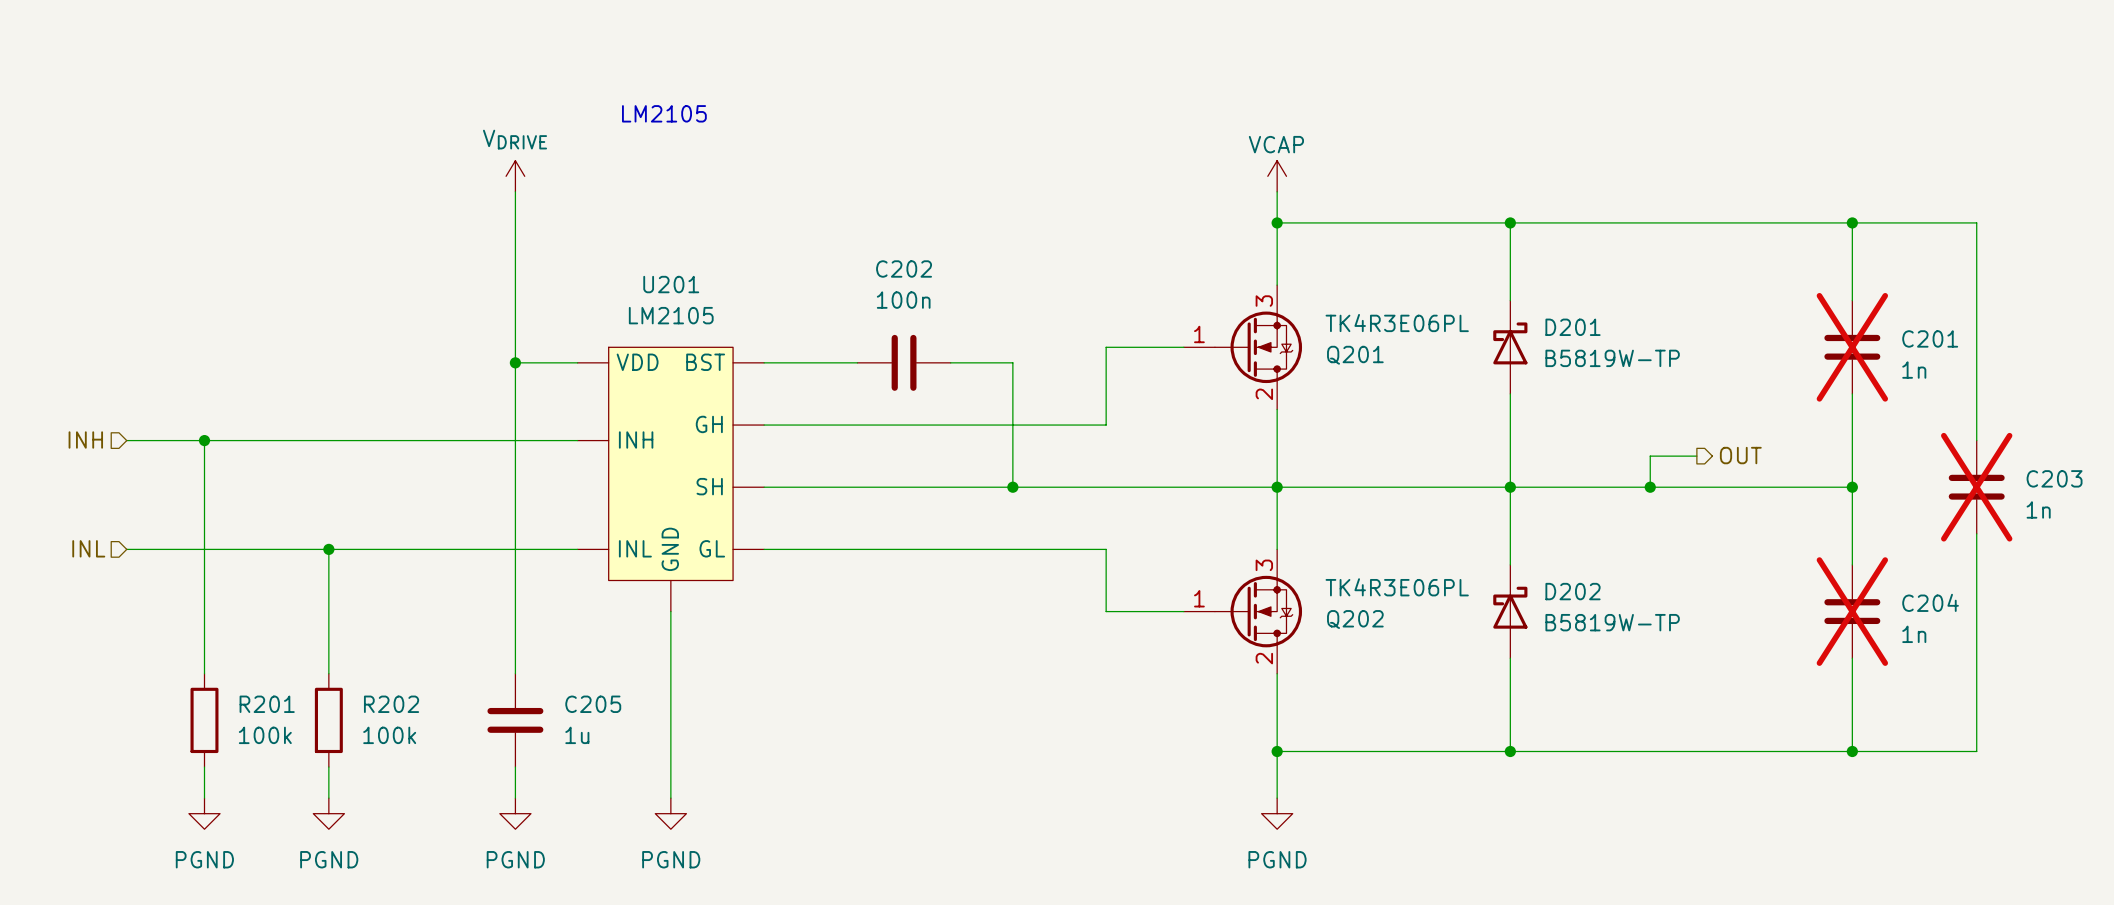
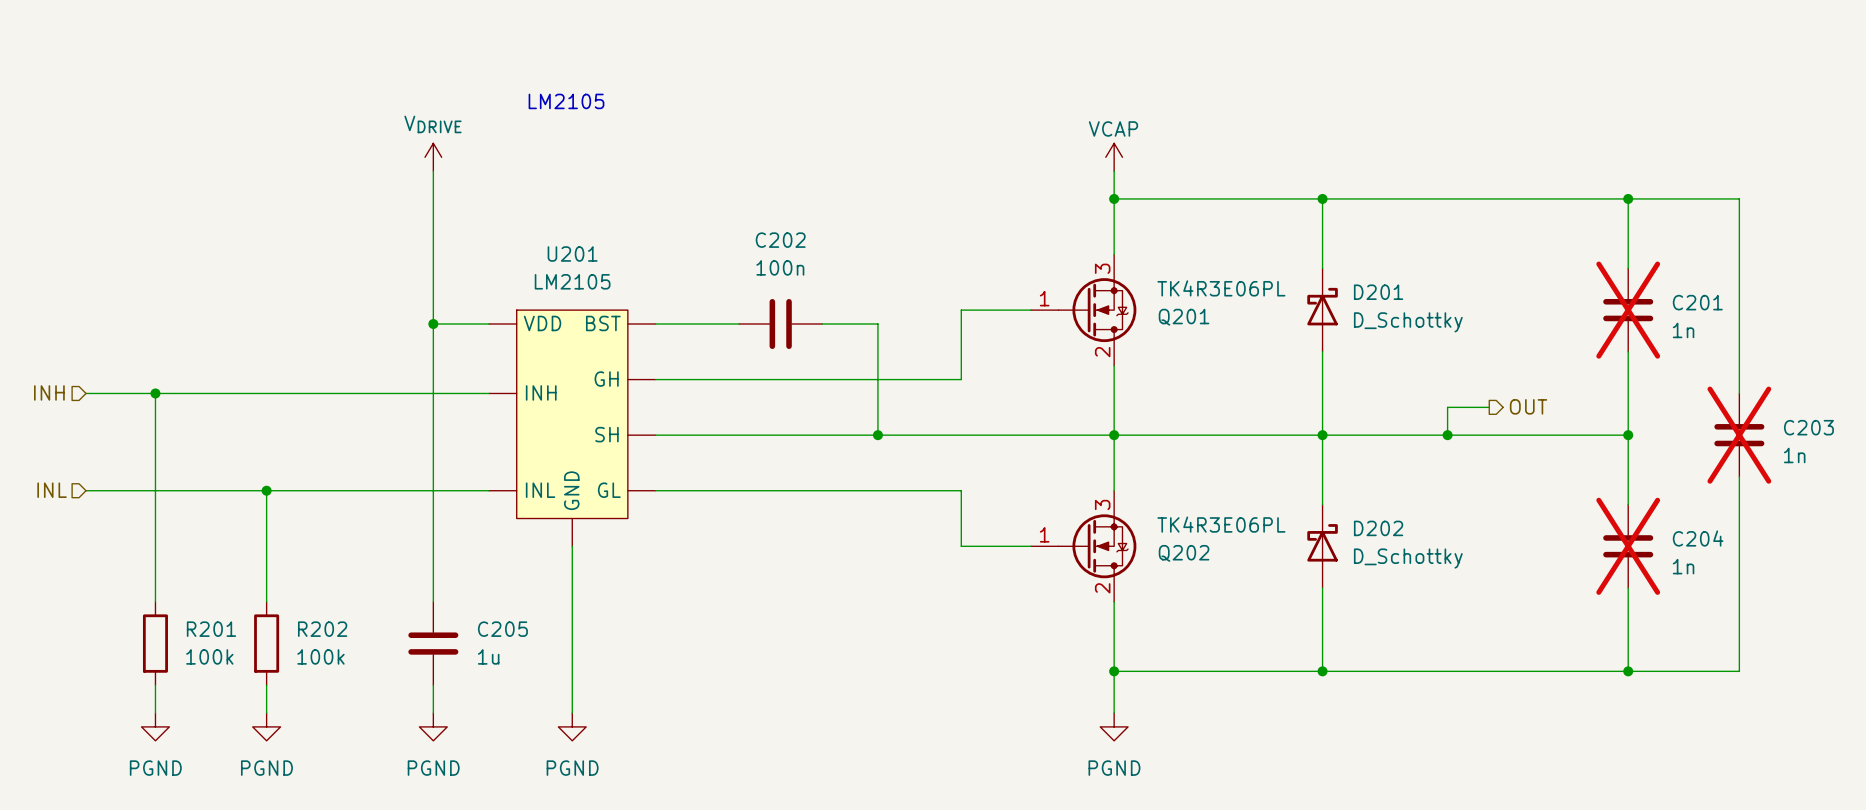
D201 value: B5819W-TP (1612, 358) -> D_Schottky (1408, 322)
D202 value: B5819W-TP (1612, 622) -> D_Schottky (1408, 558)

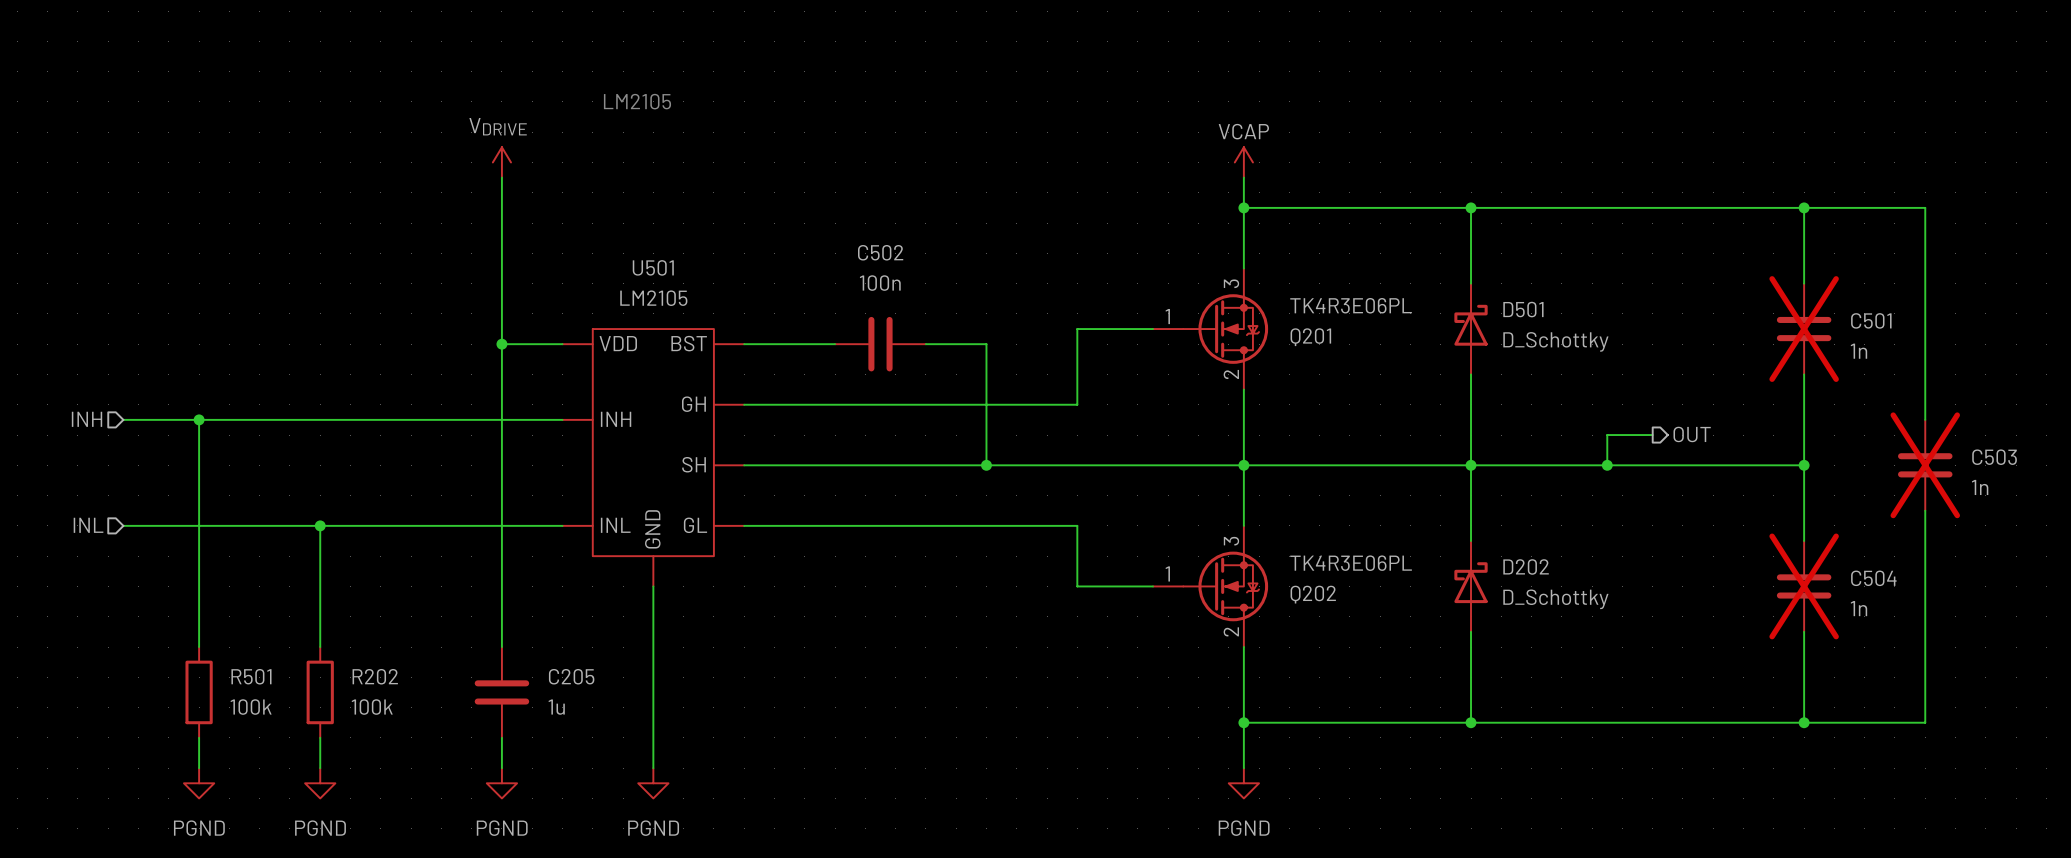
C202 name: C202 (780, 240) -> C502 (880, 252)
U201 name: U201 (572, 254) -> U501 (653, 267)
D201 name: D201 (1378, 292) -> D501 (1523, 309)
C201 name: C201 (1697, 302) -> C501 (1871, 320)
C203 name: C203 (1808, 427) -> C503 (1994, 457)
C204 name: C204 (1698, 538) -> C504 (1873, 578)
R201 name: R201 (211, 629) -> R501 (251, 676)

